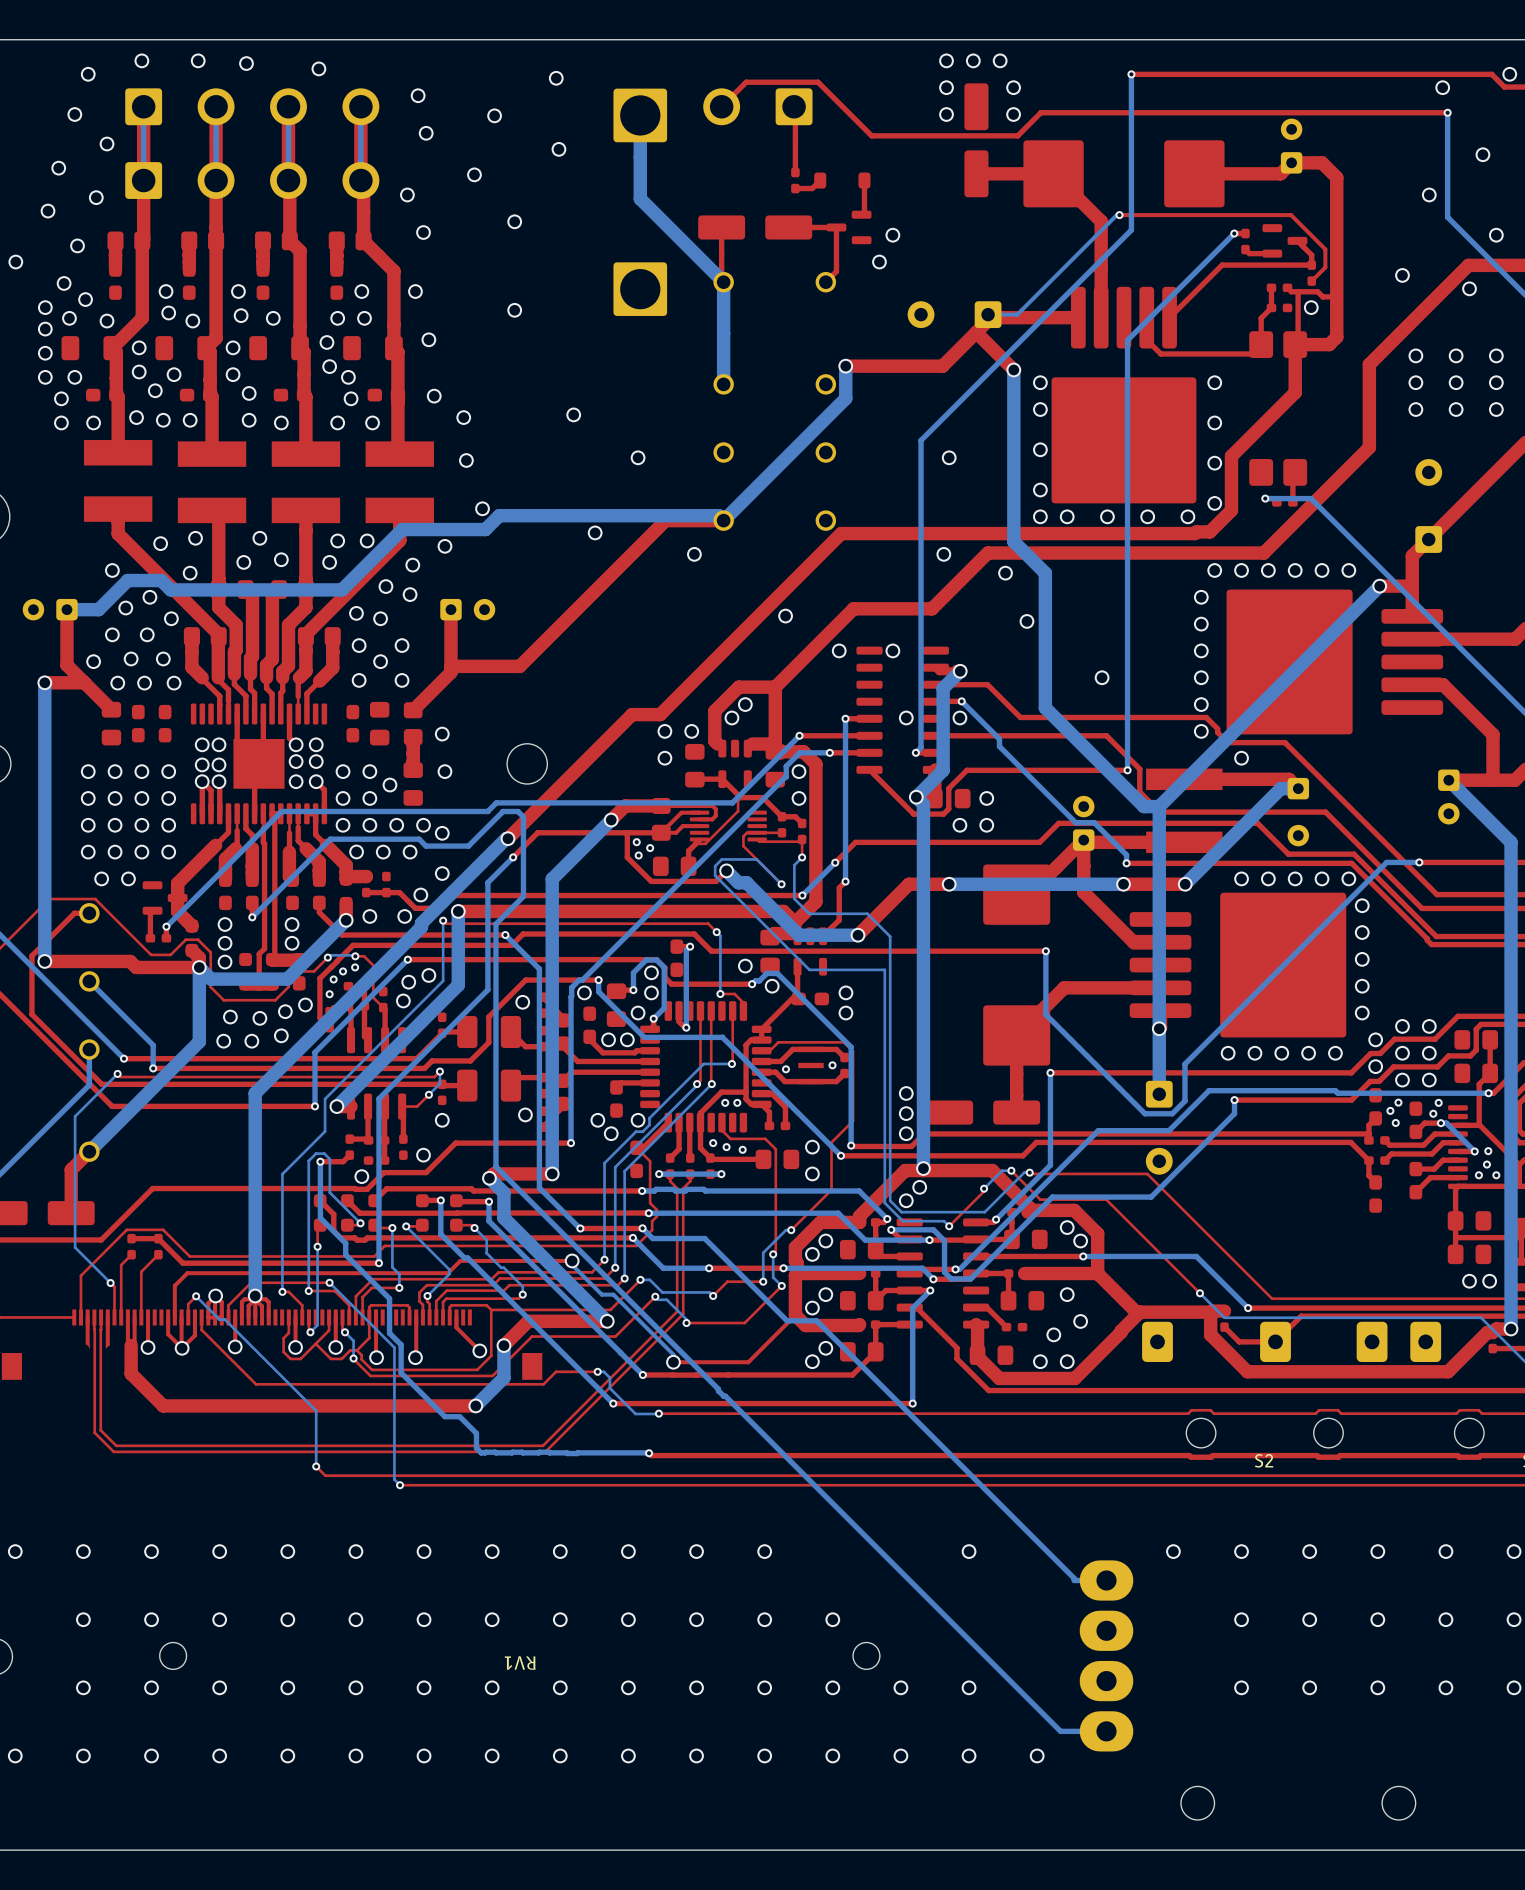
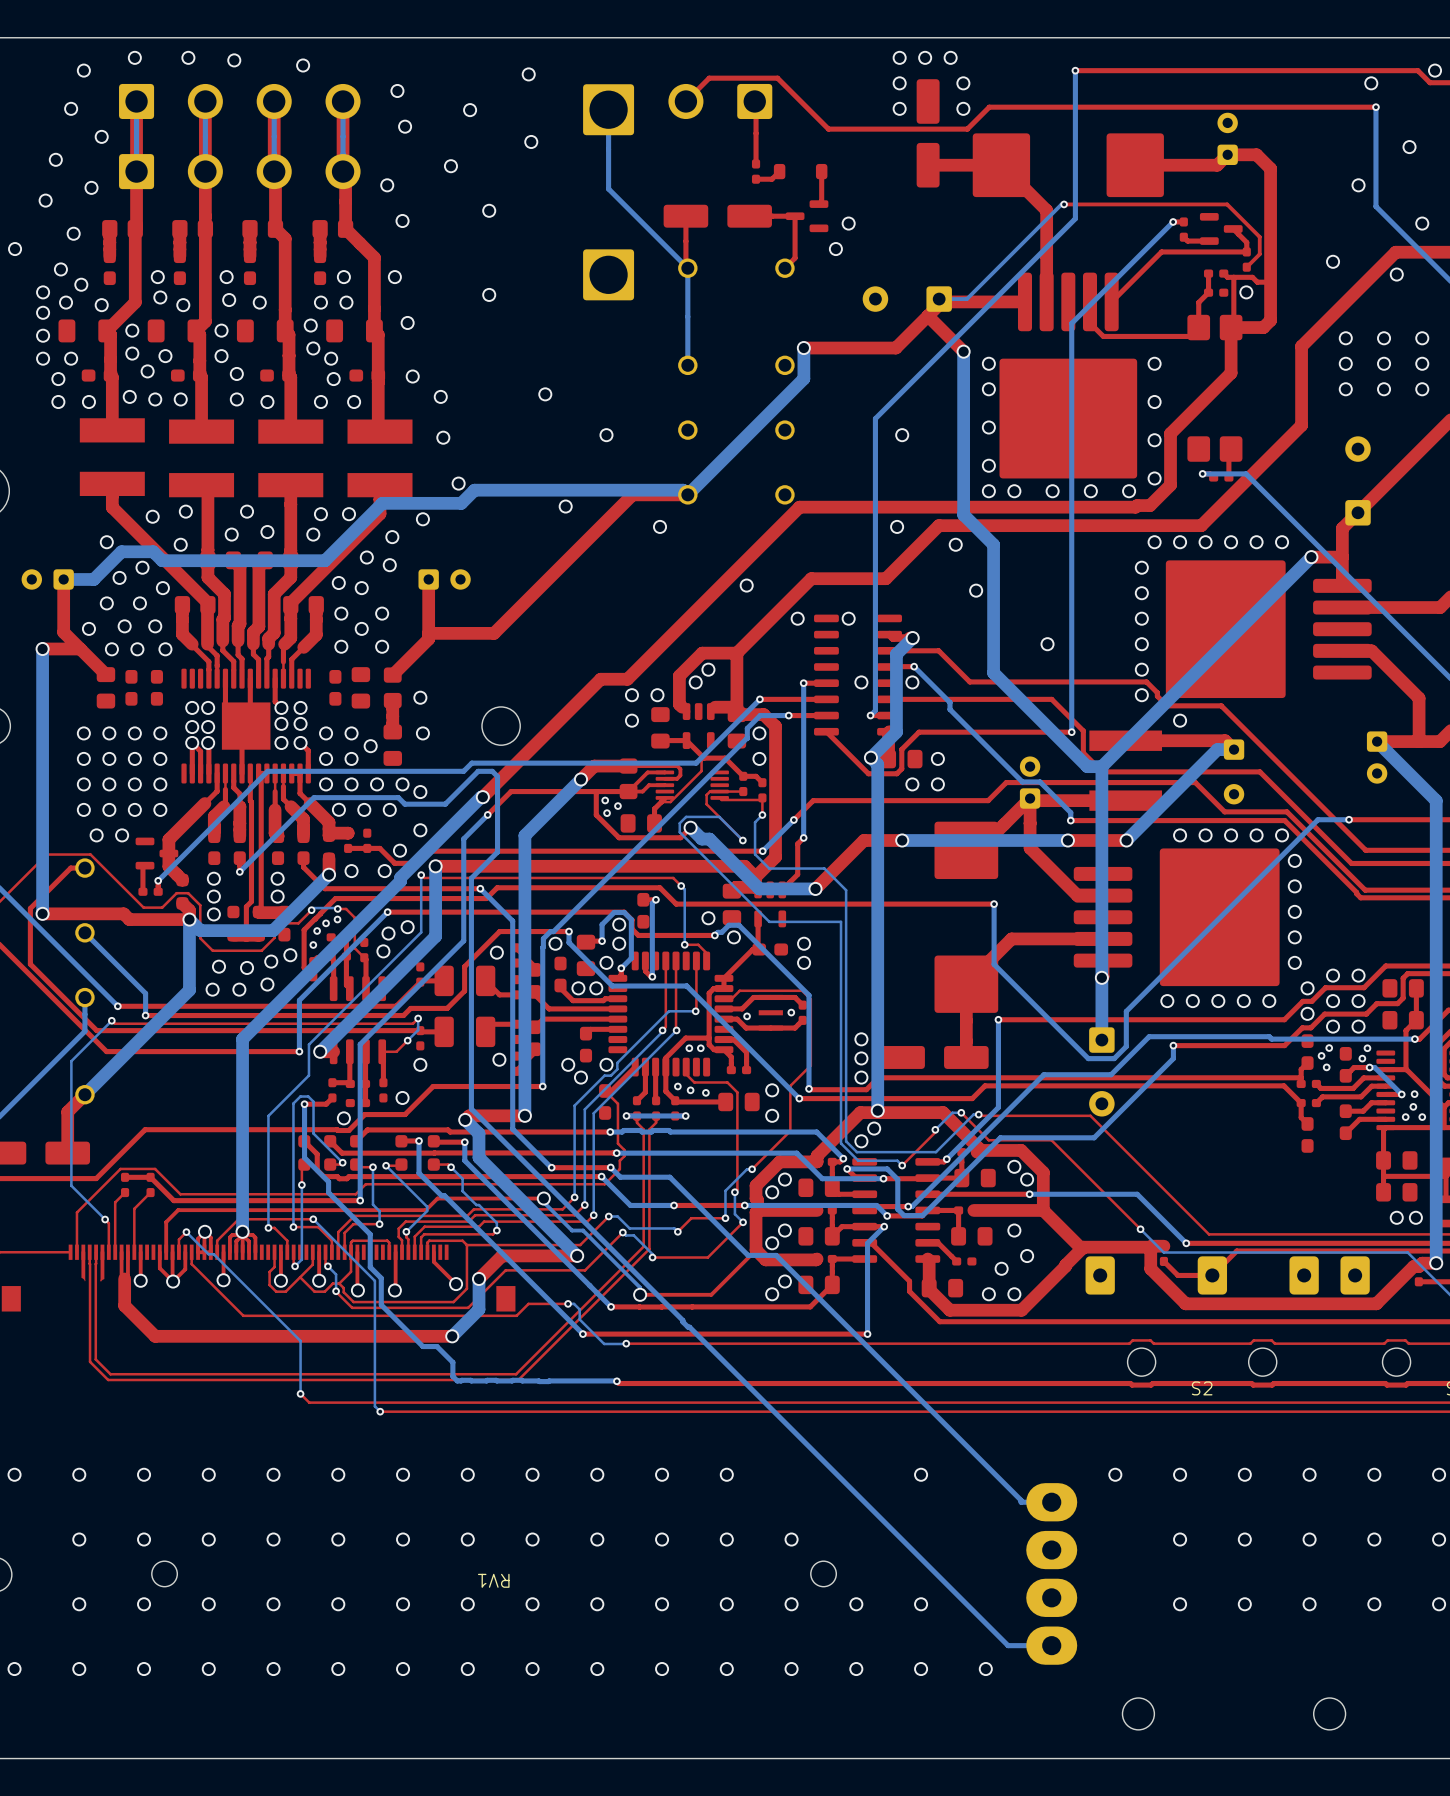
bottom track width: thick (640, 115) (640, 198) (723, 282) (723, 384) -> thin (608, 109) (608, 188) (687, 268) (687, 365)

